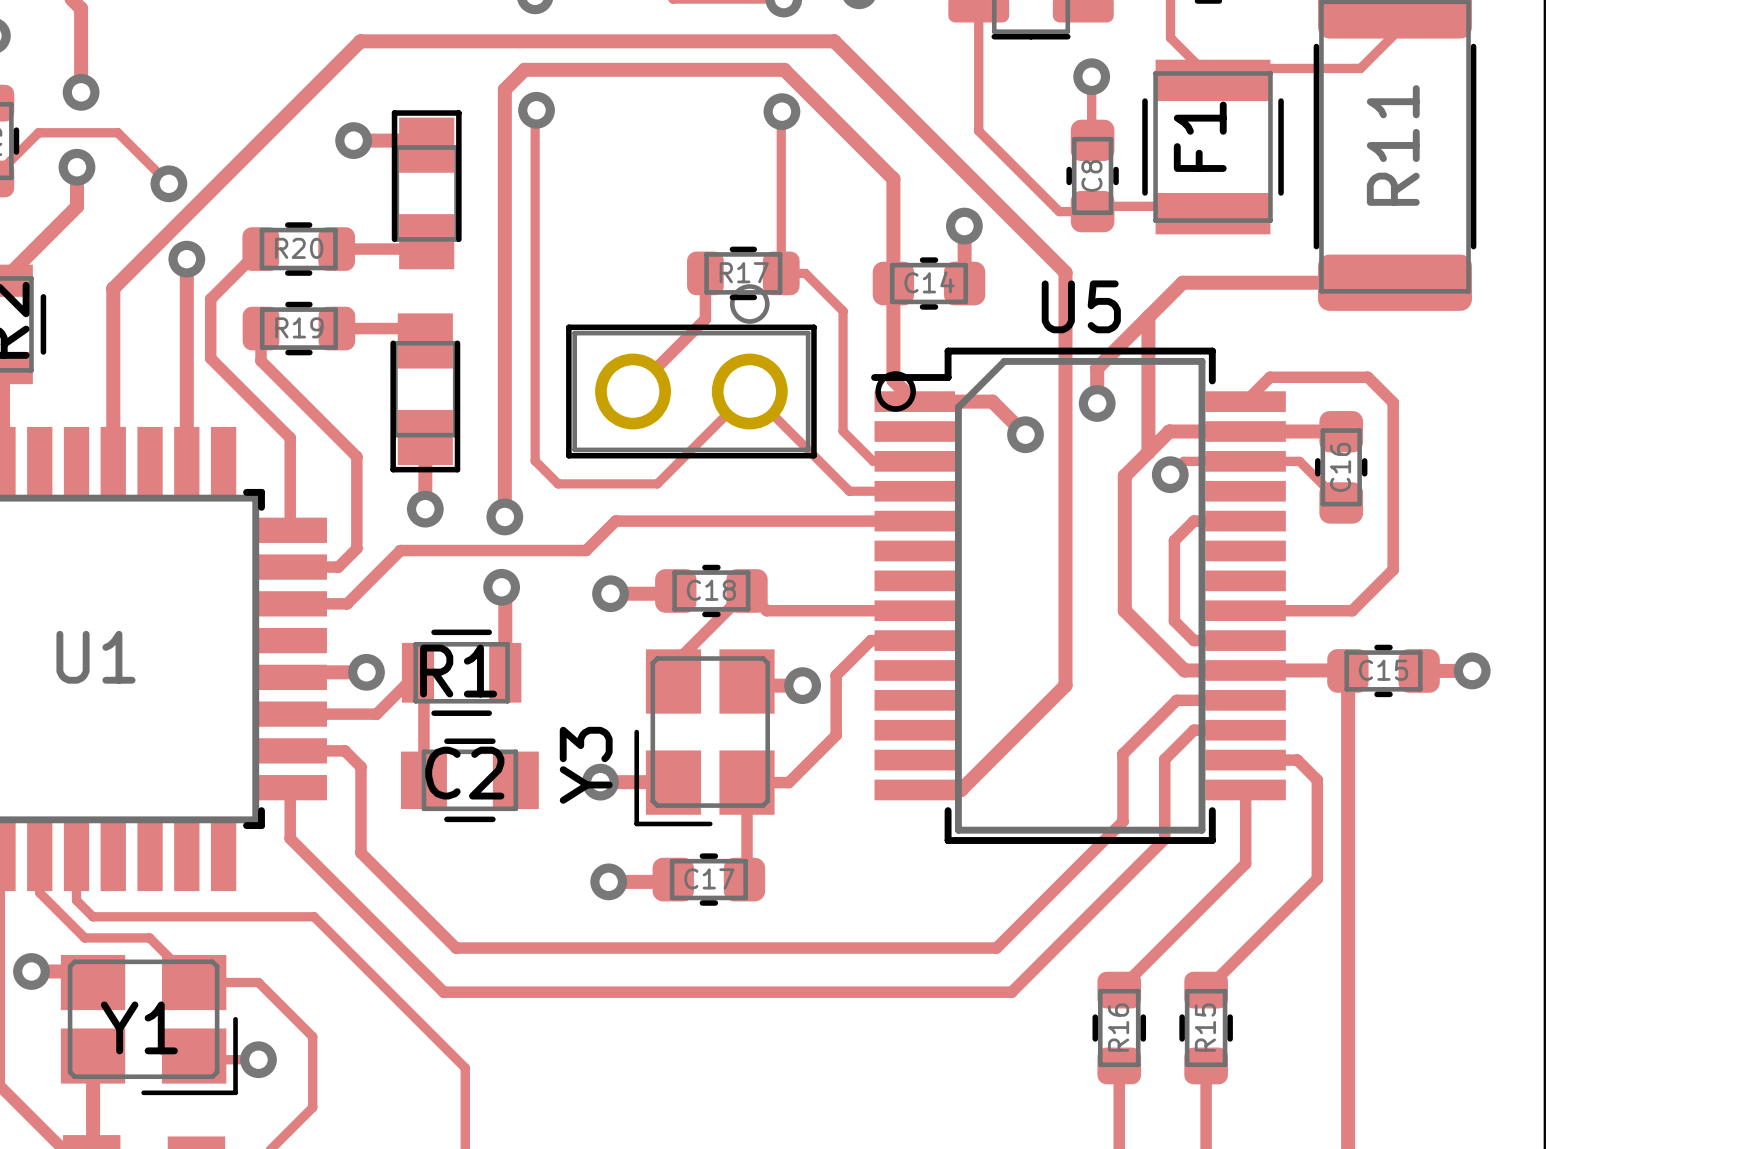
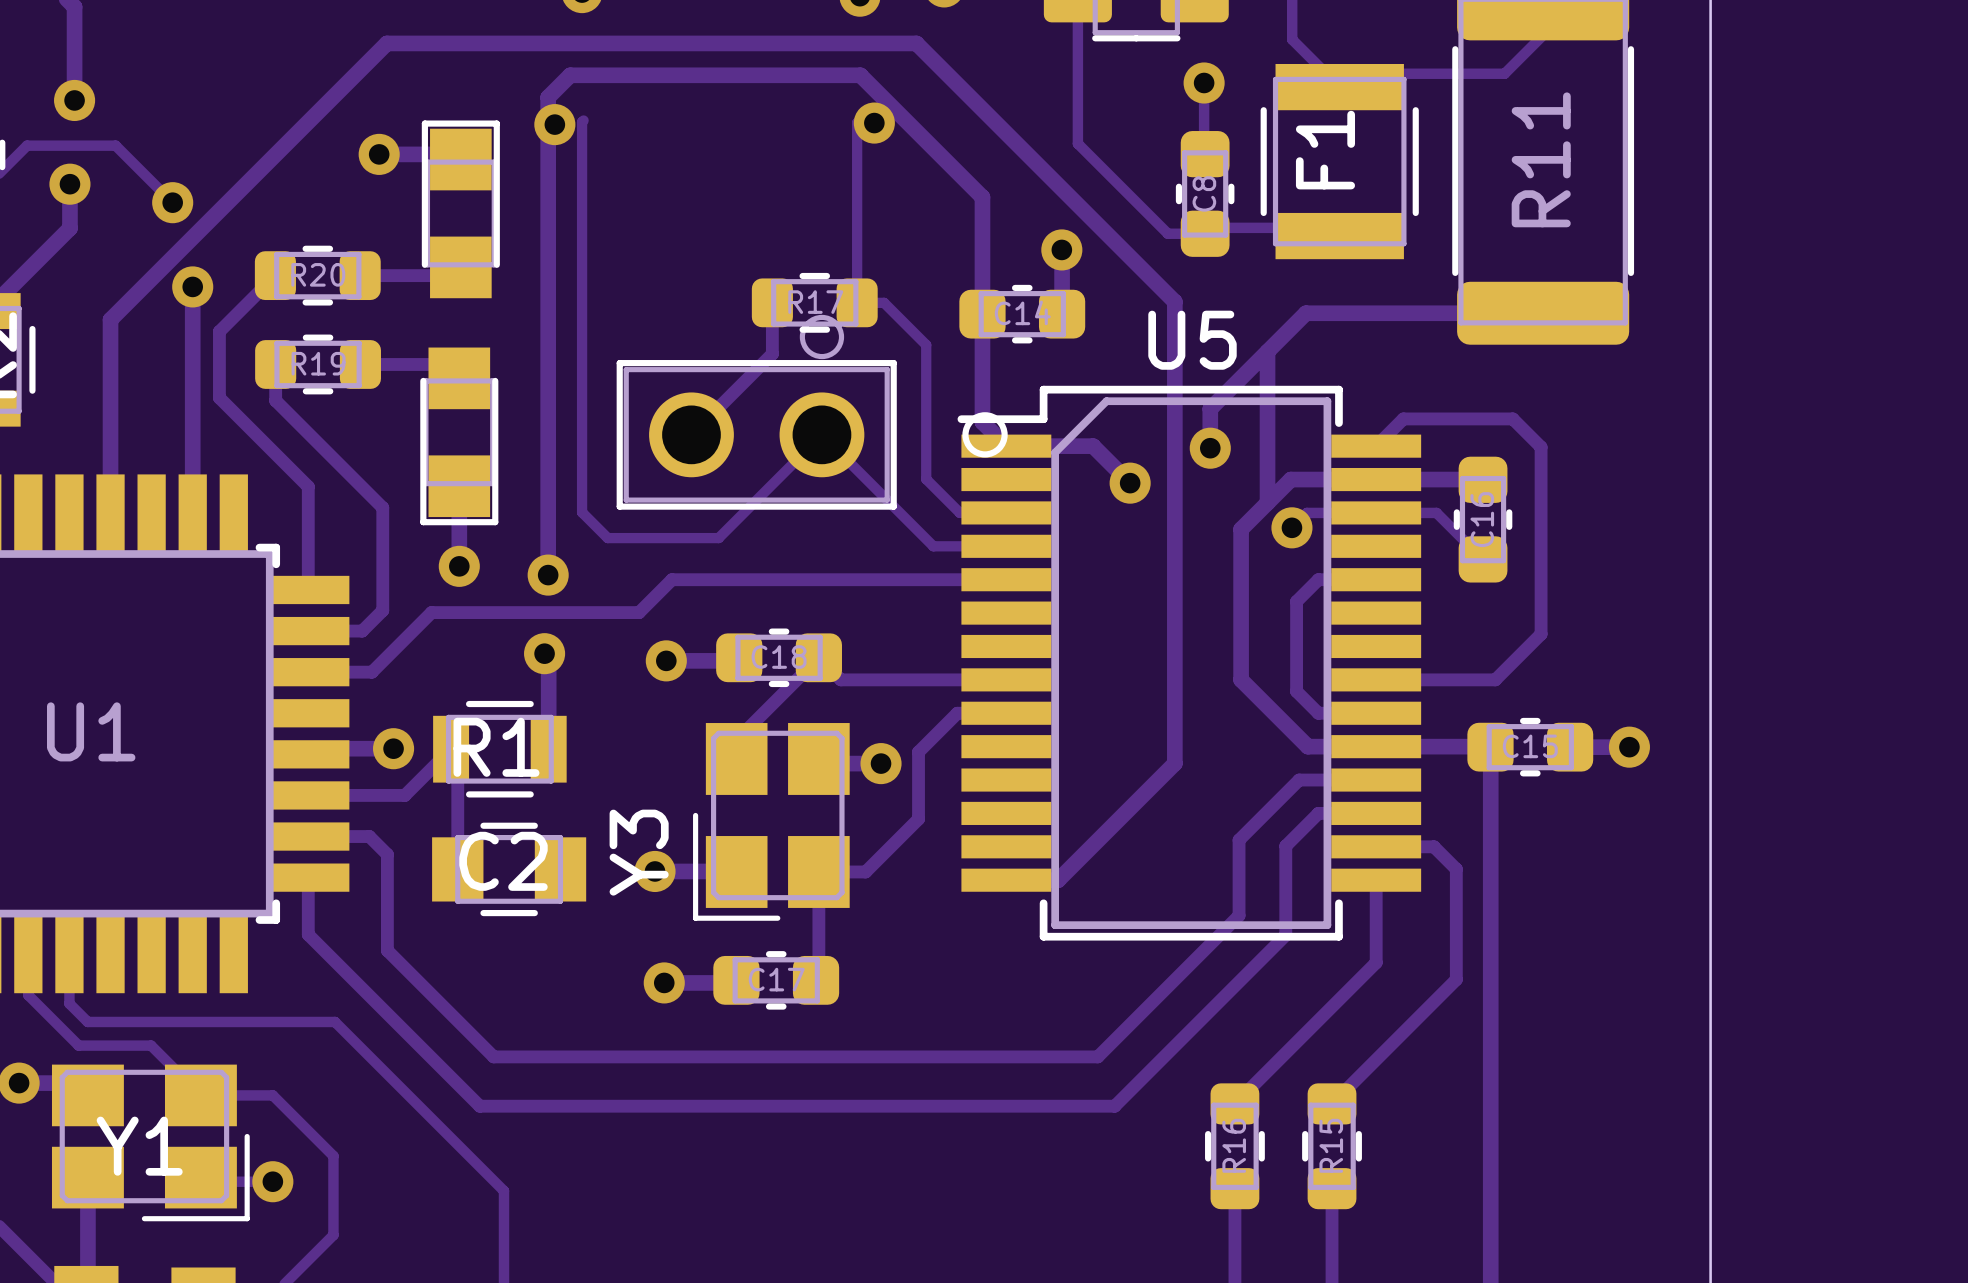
via position: (536, 110) -> (554, 124)
via position: (781, 111) -> (874, 123)

